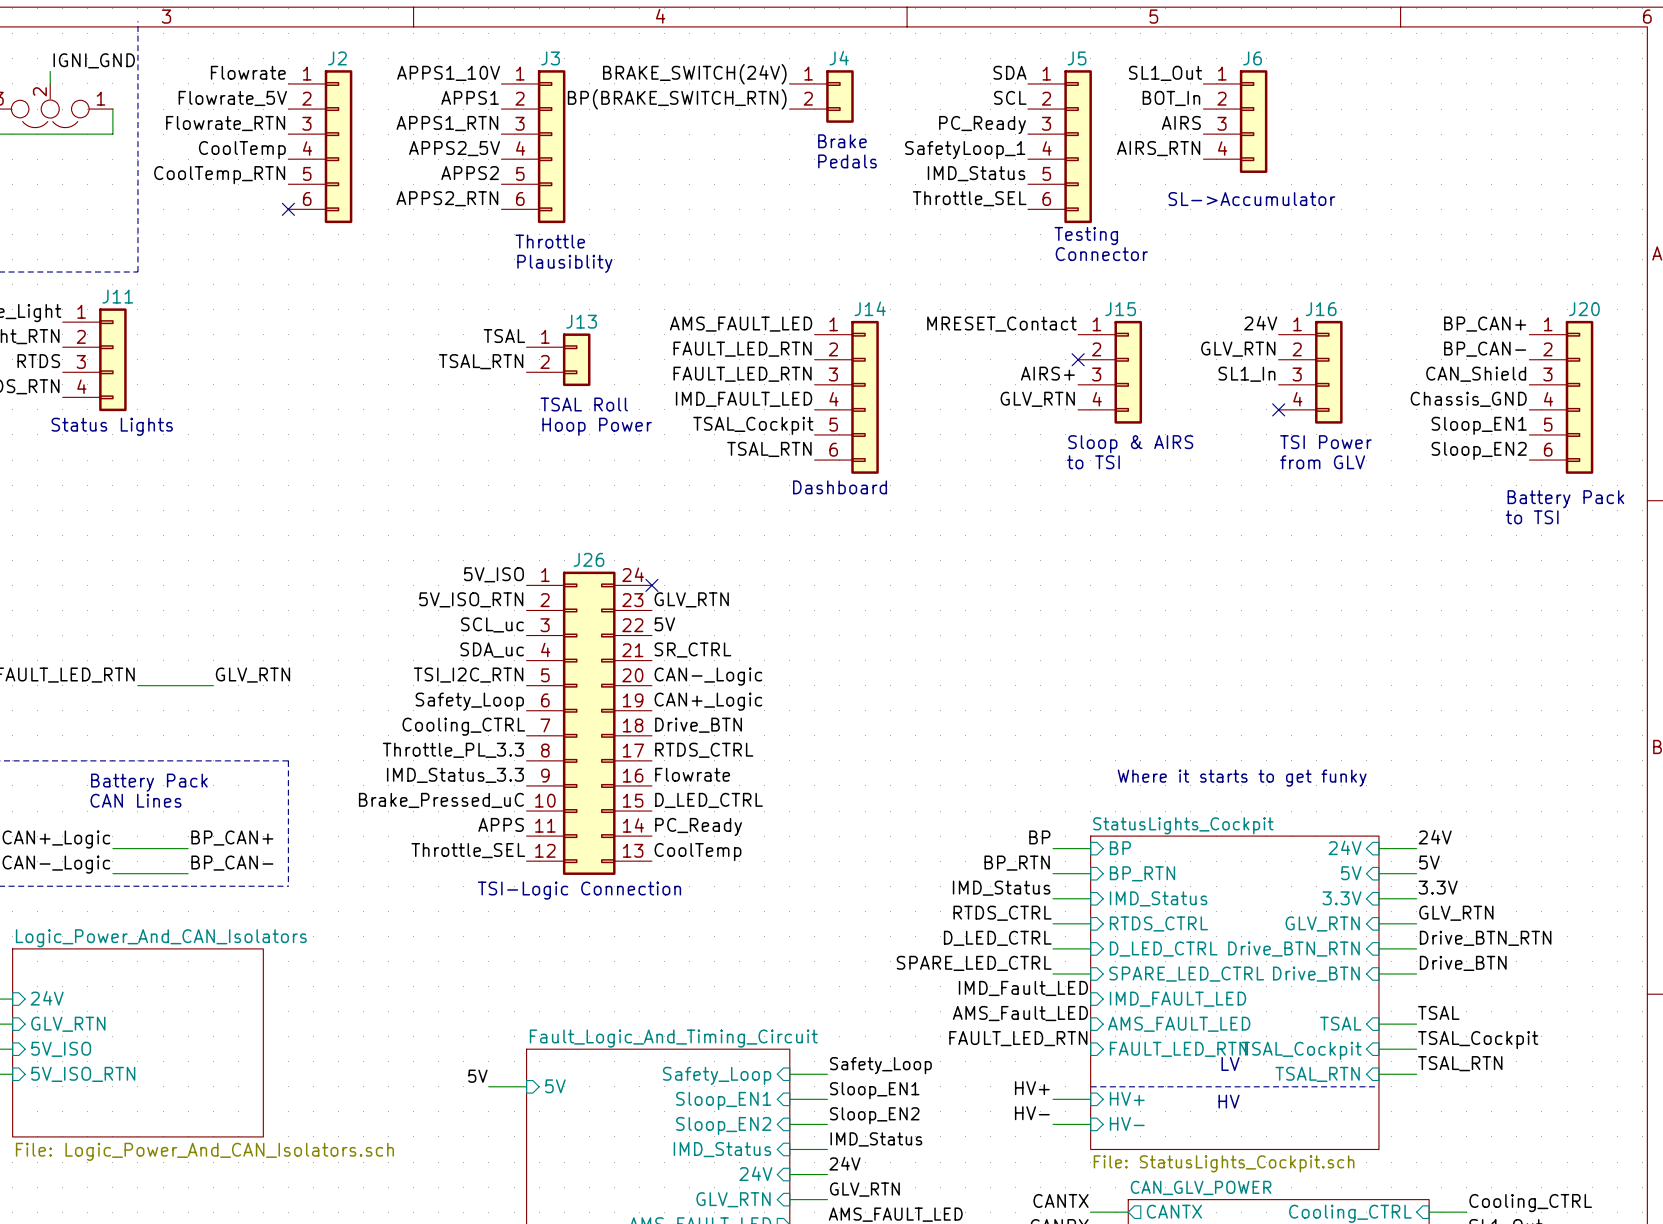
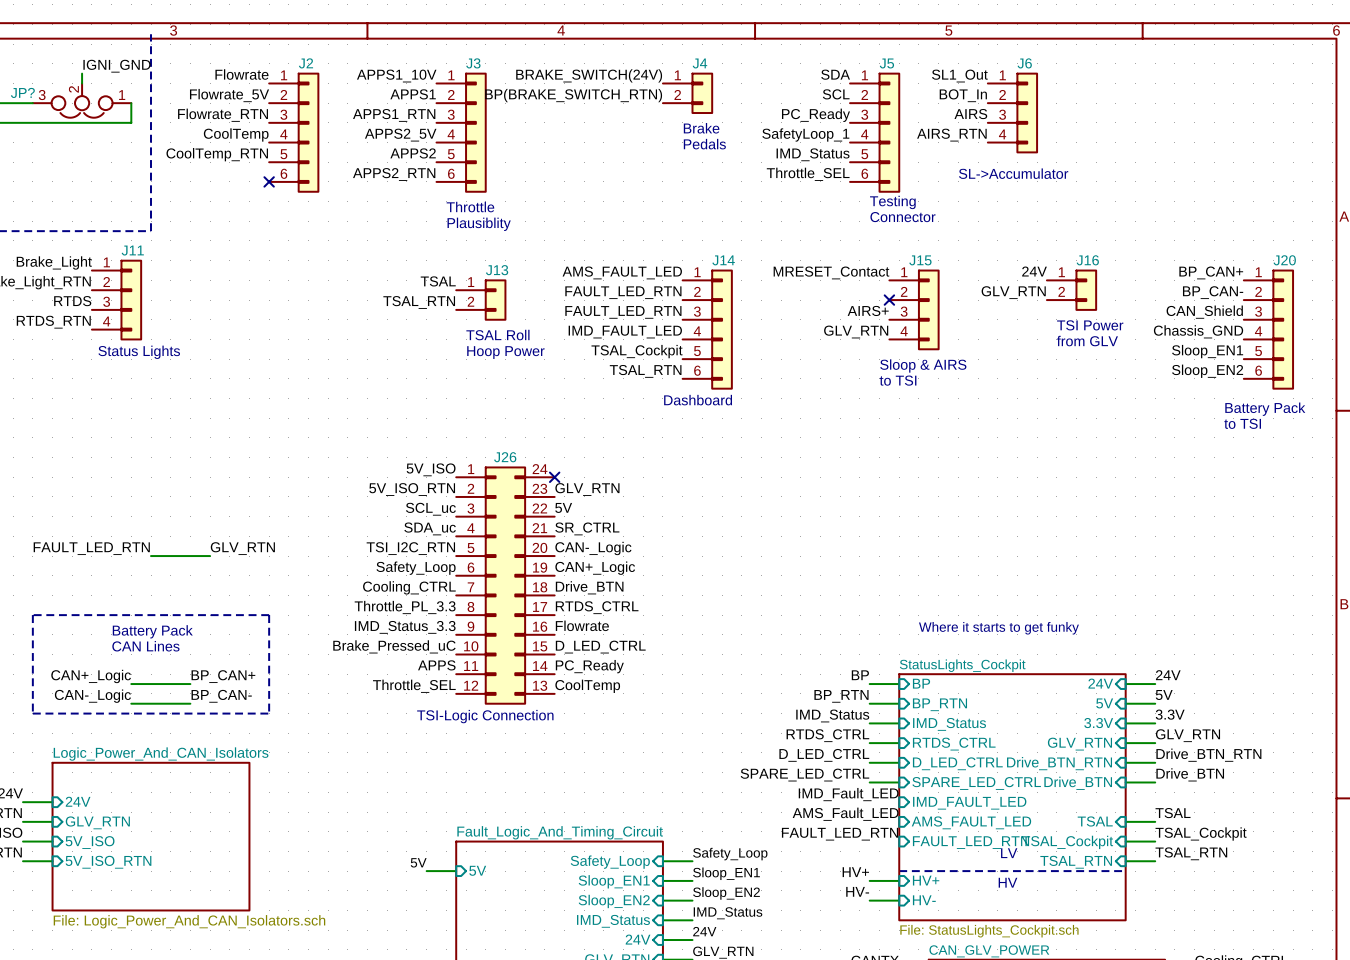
part: none -> J16 (1072, 290)
part: J16 (1310, 372) -> none
label: SL1_In (1246, 374) -> none
no-connect mark: (1278, 409) -> none
text position: TSI Power (1325, 442) -> TSI Power (1090, 325)
text position: from GLV (1322, 462) -> from GLV (1087, 341)

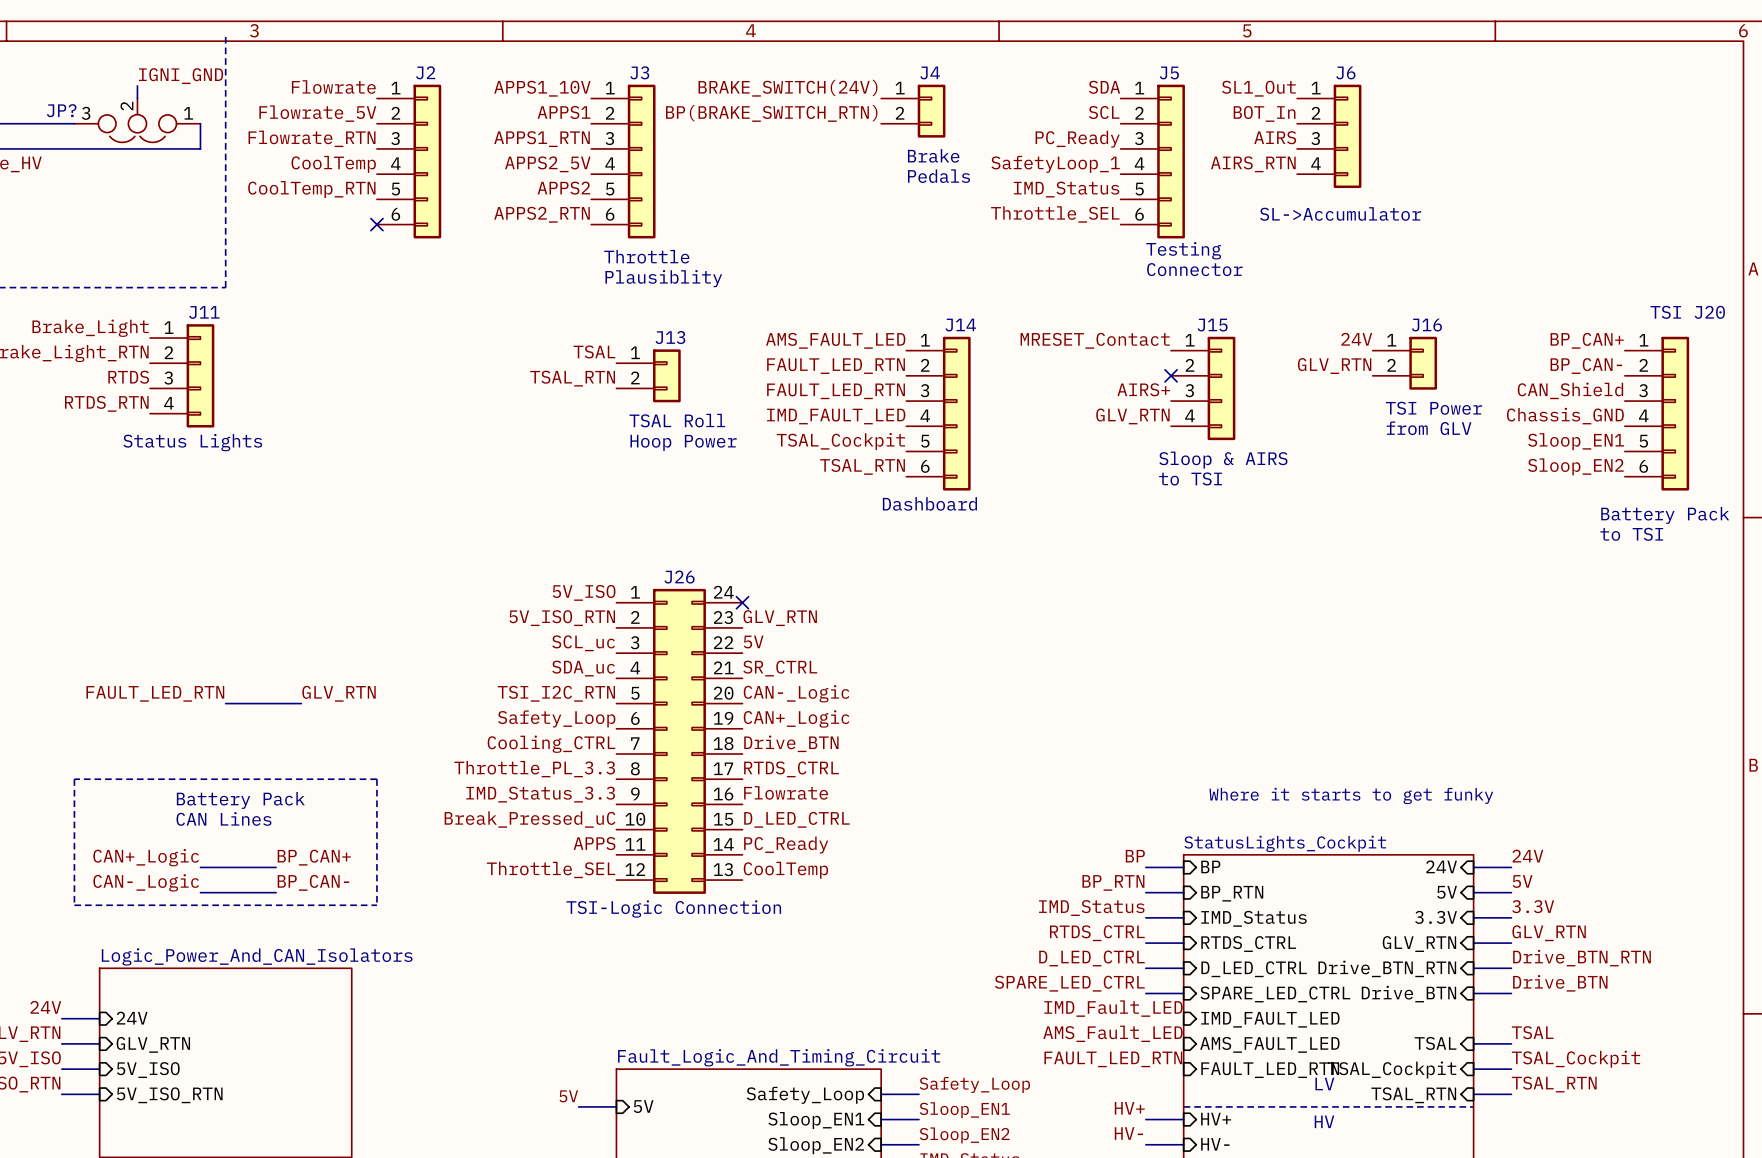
part value: J20 (1284, 260) -> TSI J20 (1687, 312)
label: Brake_Pressed_uC (394, 646) -> Break_Pressed_uC (529, 819)

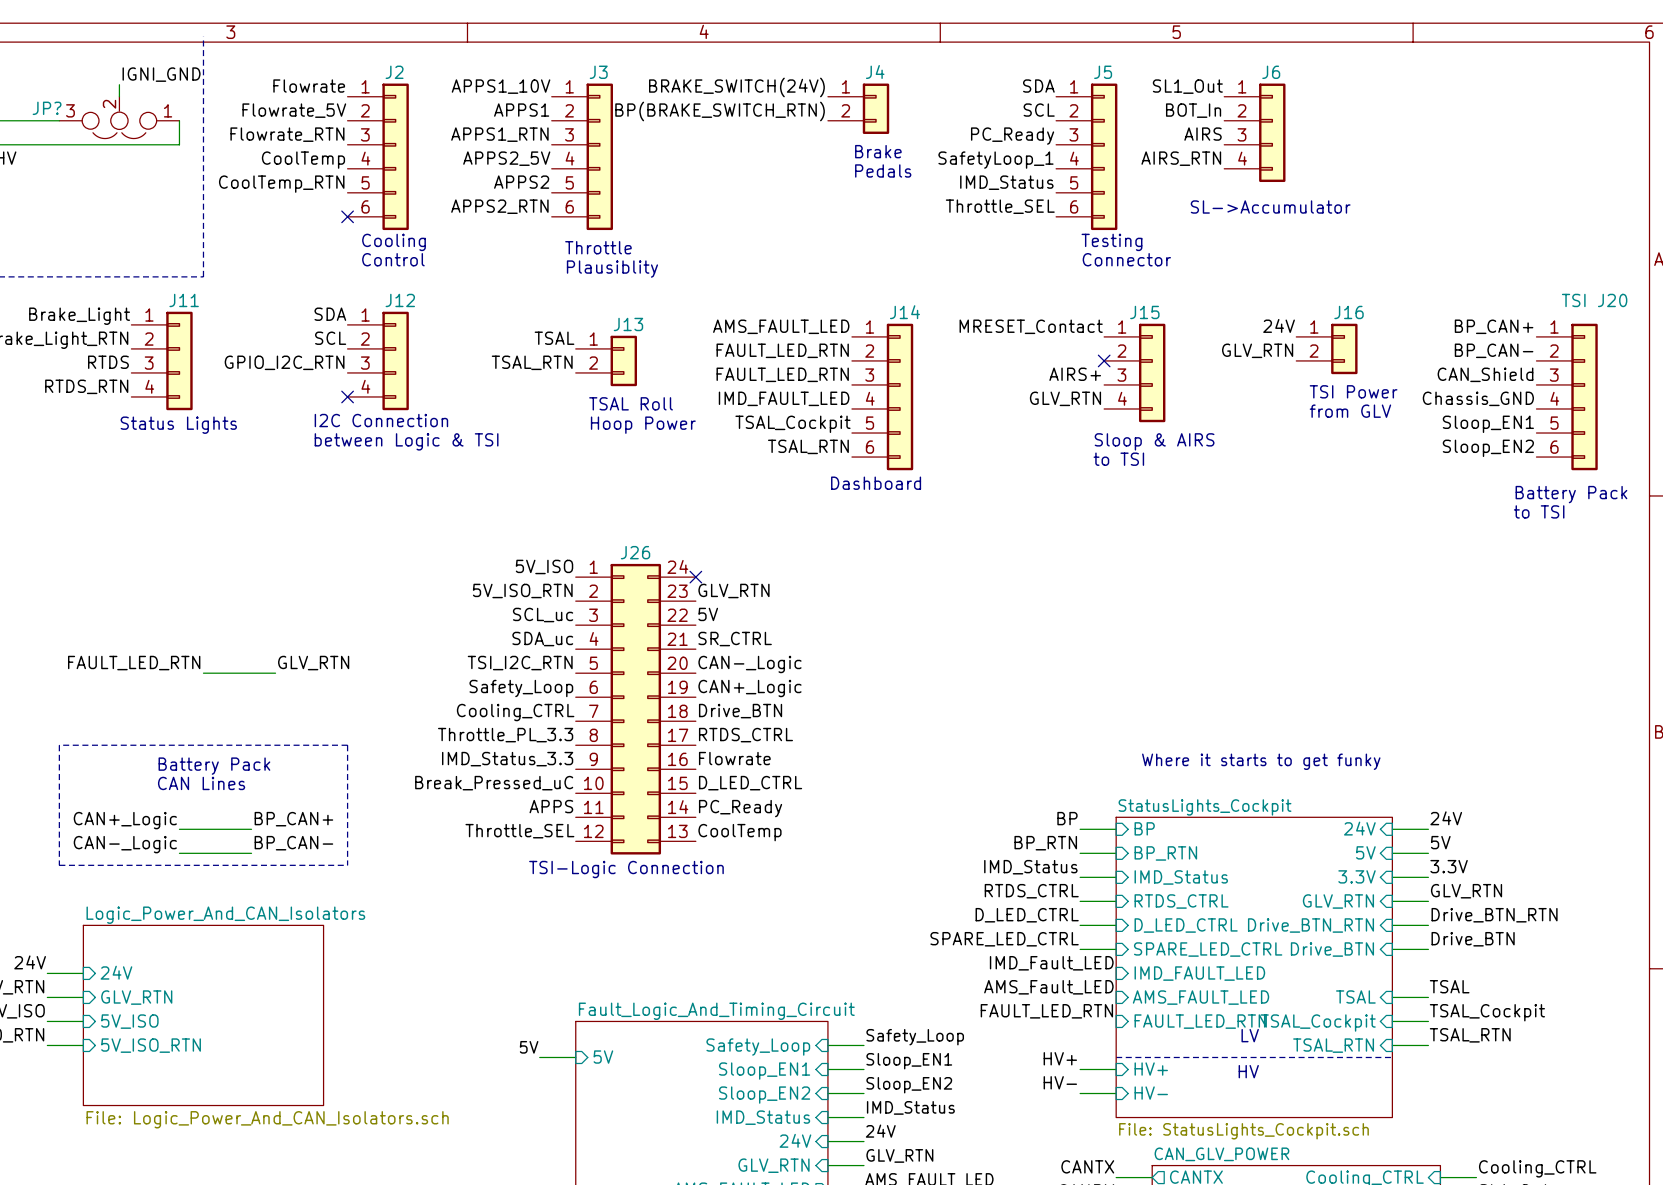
text: none -> Cooling (393, 242)
text: none -> Control (393, 259)
label: none -> SDA (330, 314)
label: none -> SCL (330, 338)
part: none -> J12 (378, 360)
label: none -> GPIO_I2C_RTN (284, 362)
no-connect mark: none -> (347, 396)
text: none -> I2C Connection (381, 420)
text: none -> between Logic & TSI (406, 441)

